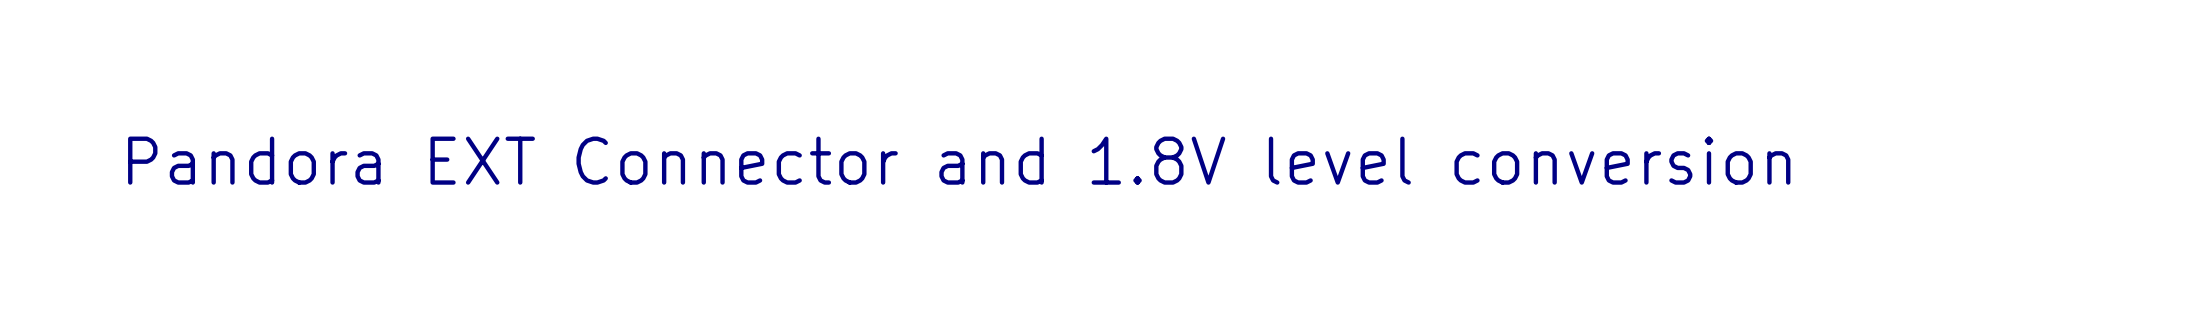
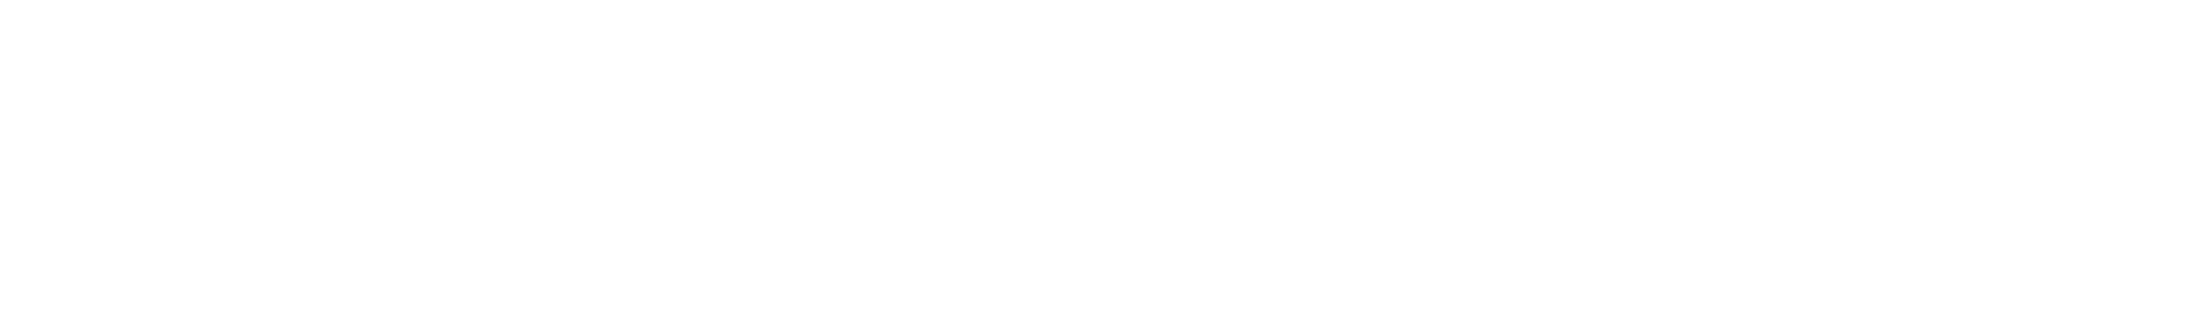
text: Pandora EXT Connector and 1.8V level conversion (959, 160) -> none

